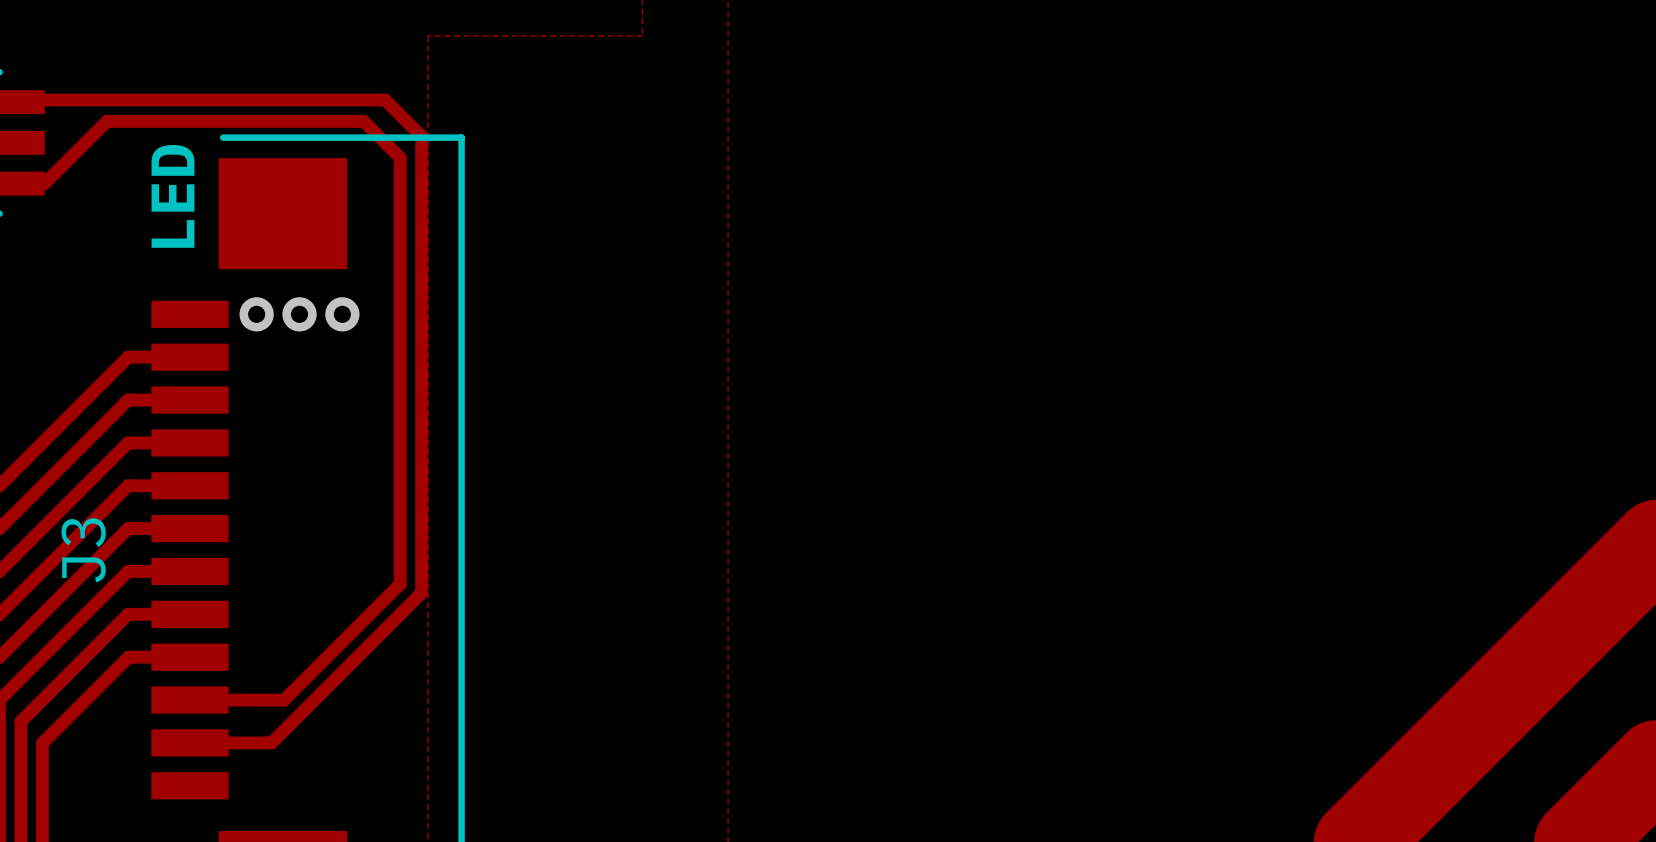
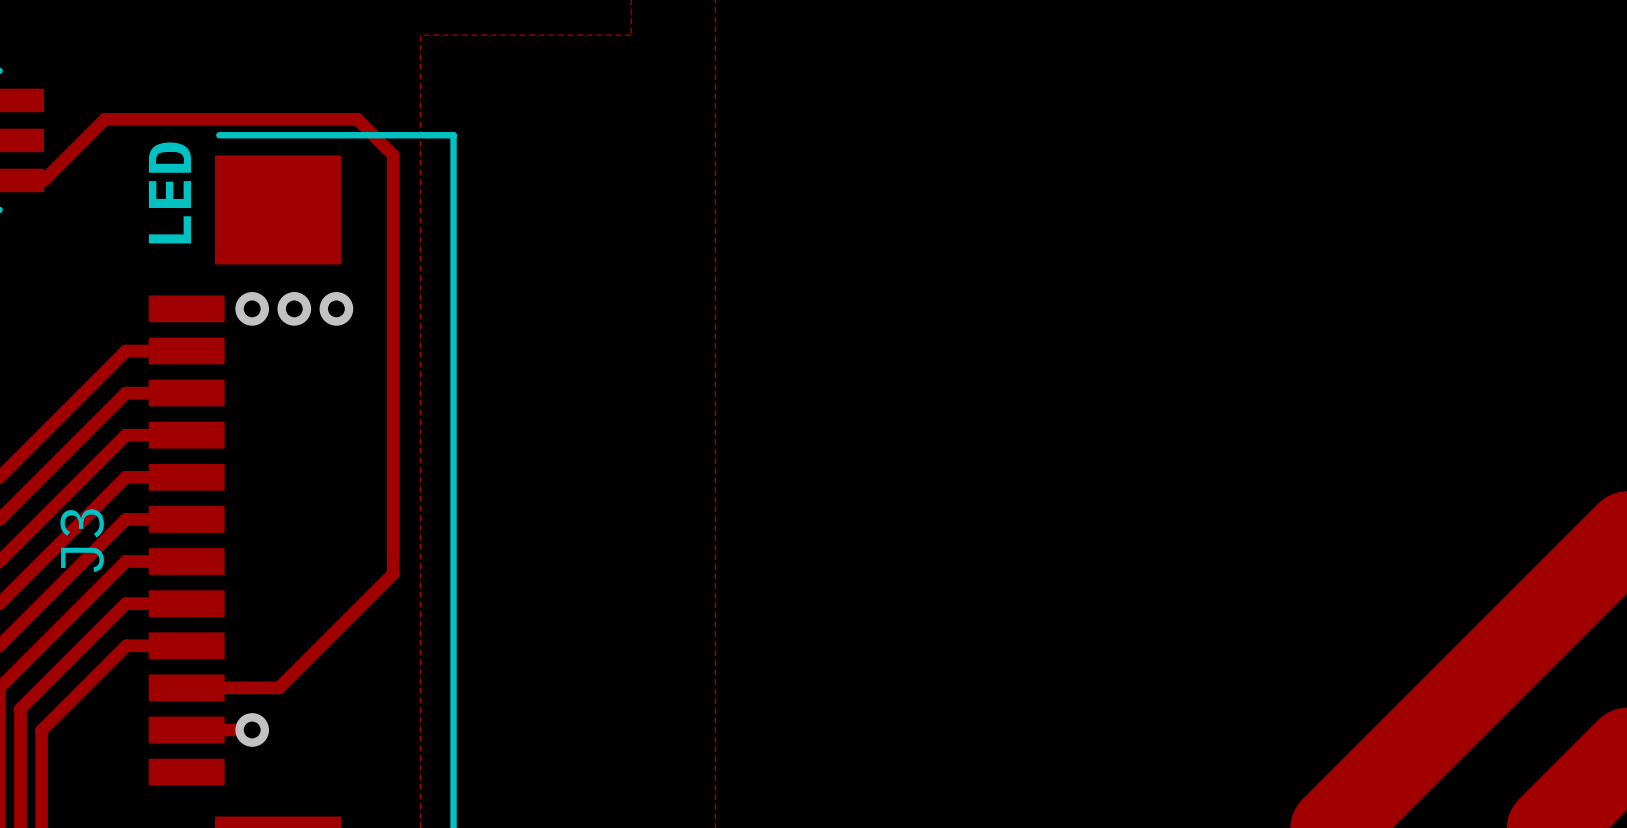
track: (19, 102) (21, 100) (385, 100) (421, 136) (421, 592) (271, 742) (256, 742) -> none
via: none -> (252, 729)

